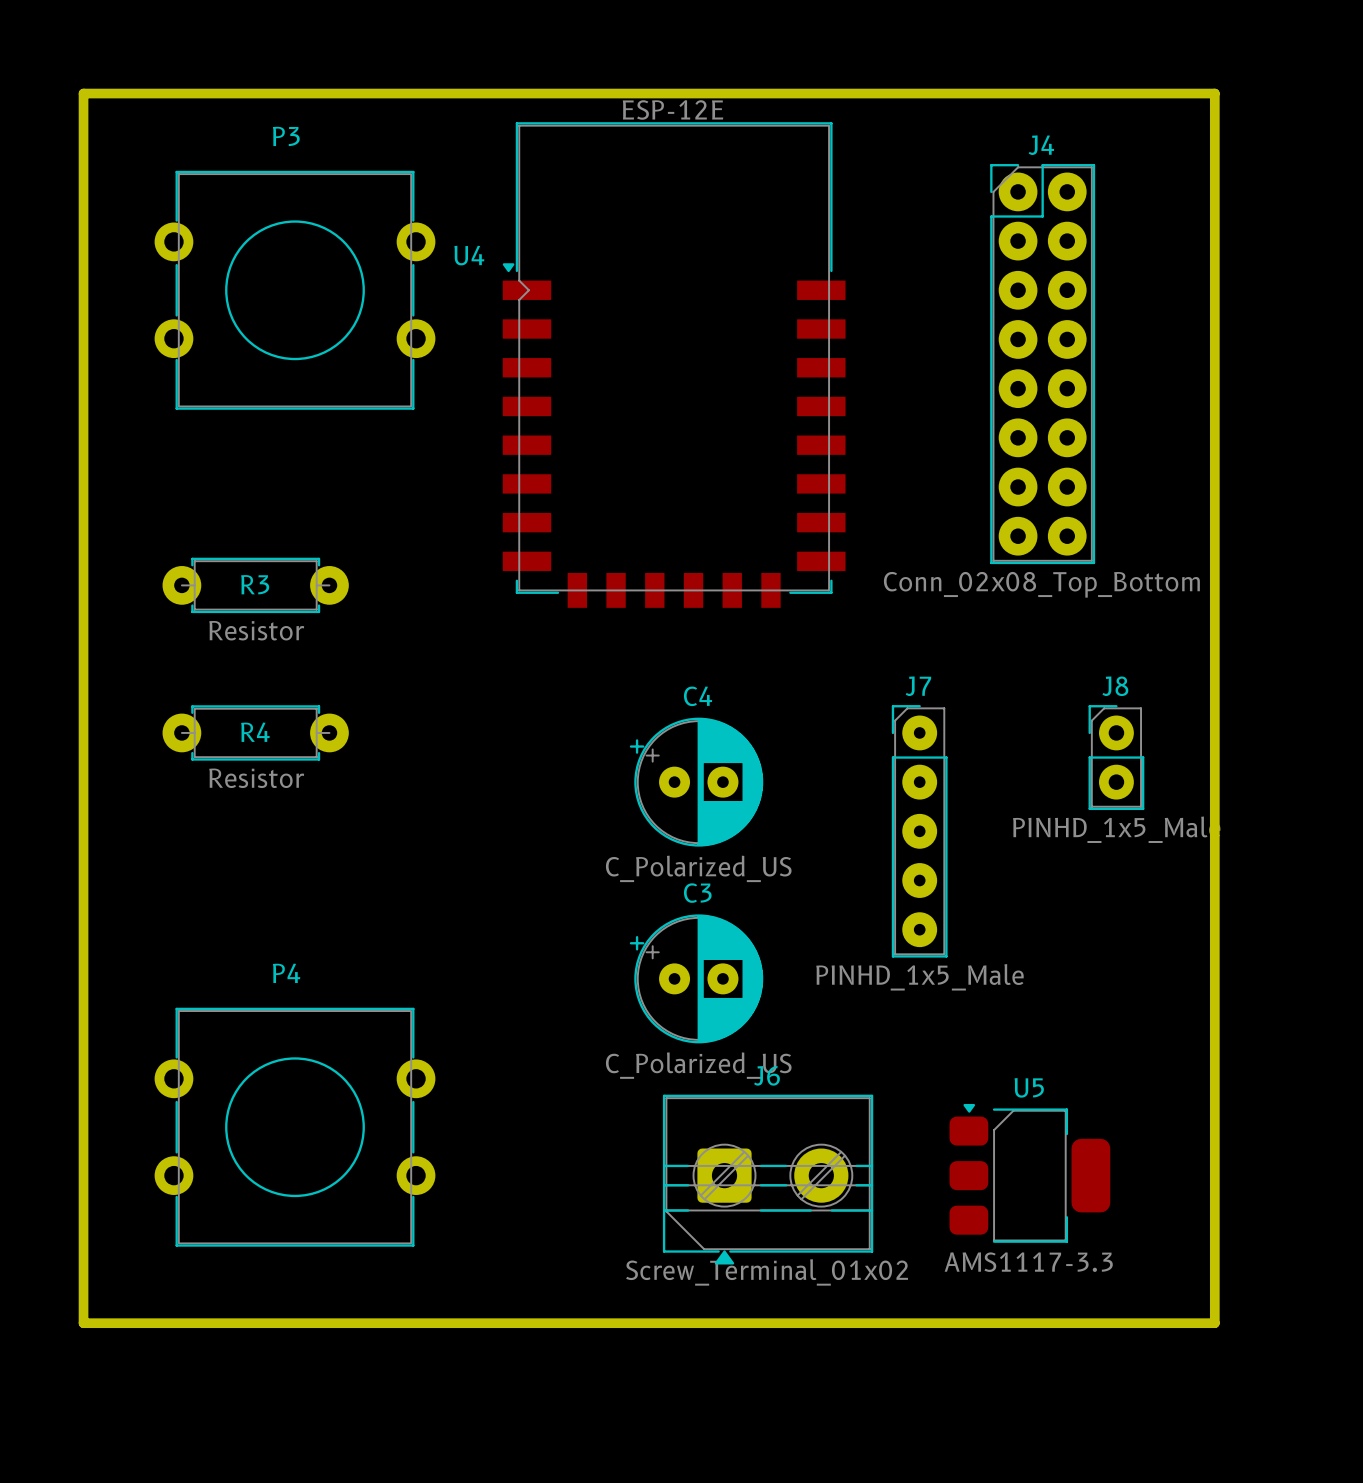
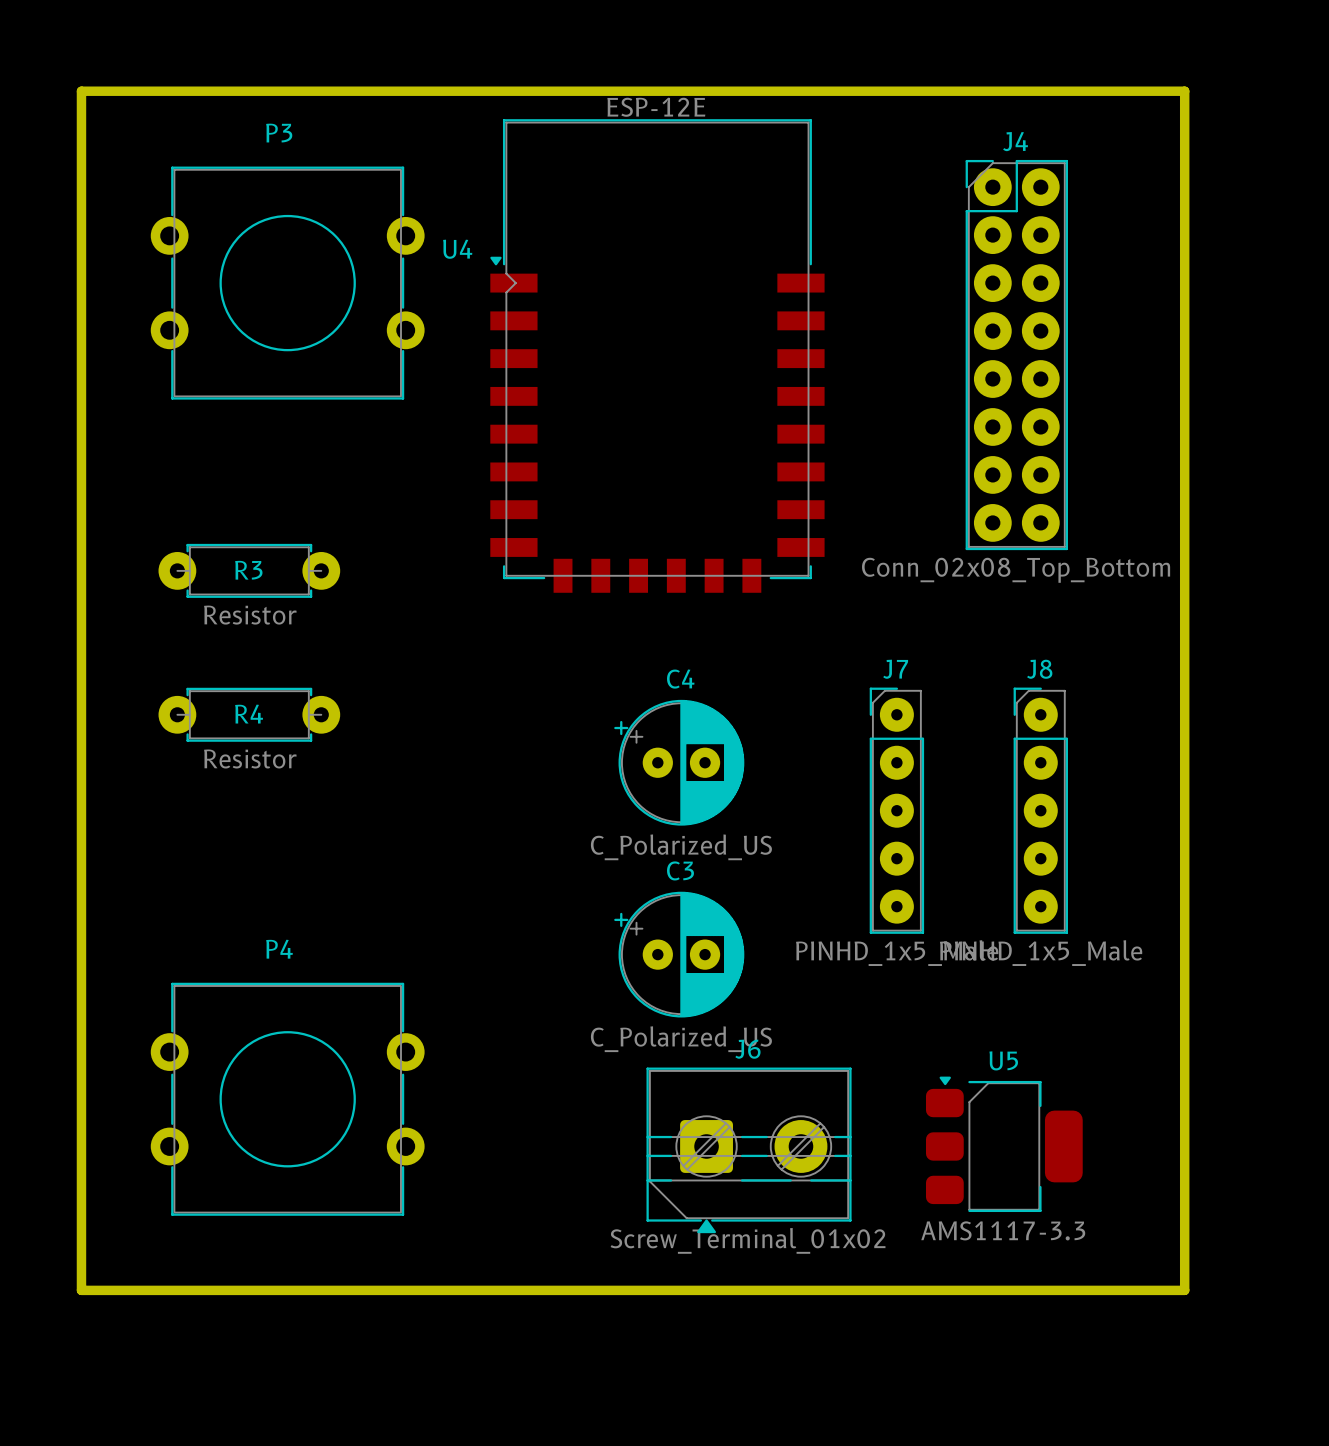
J8 name position: J8 (1115, 686) -> J8 (1039, 669)
J8 footprint: [1088, 705, 1145, 811] -> [1013, 687, 1068, 934]
J8 value position: PINHD_1x5_Male (1116, 829) -> PINHD_1x5_Male (1041, 953)

